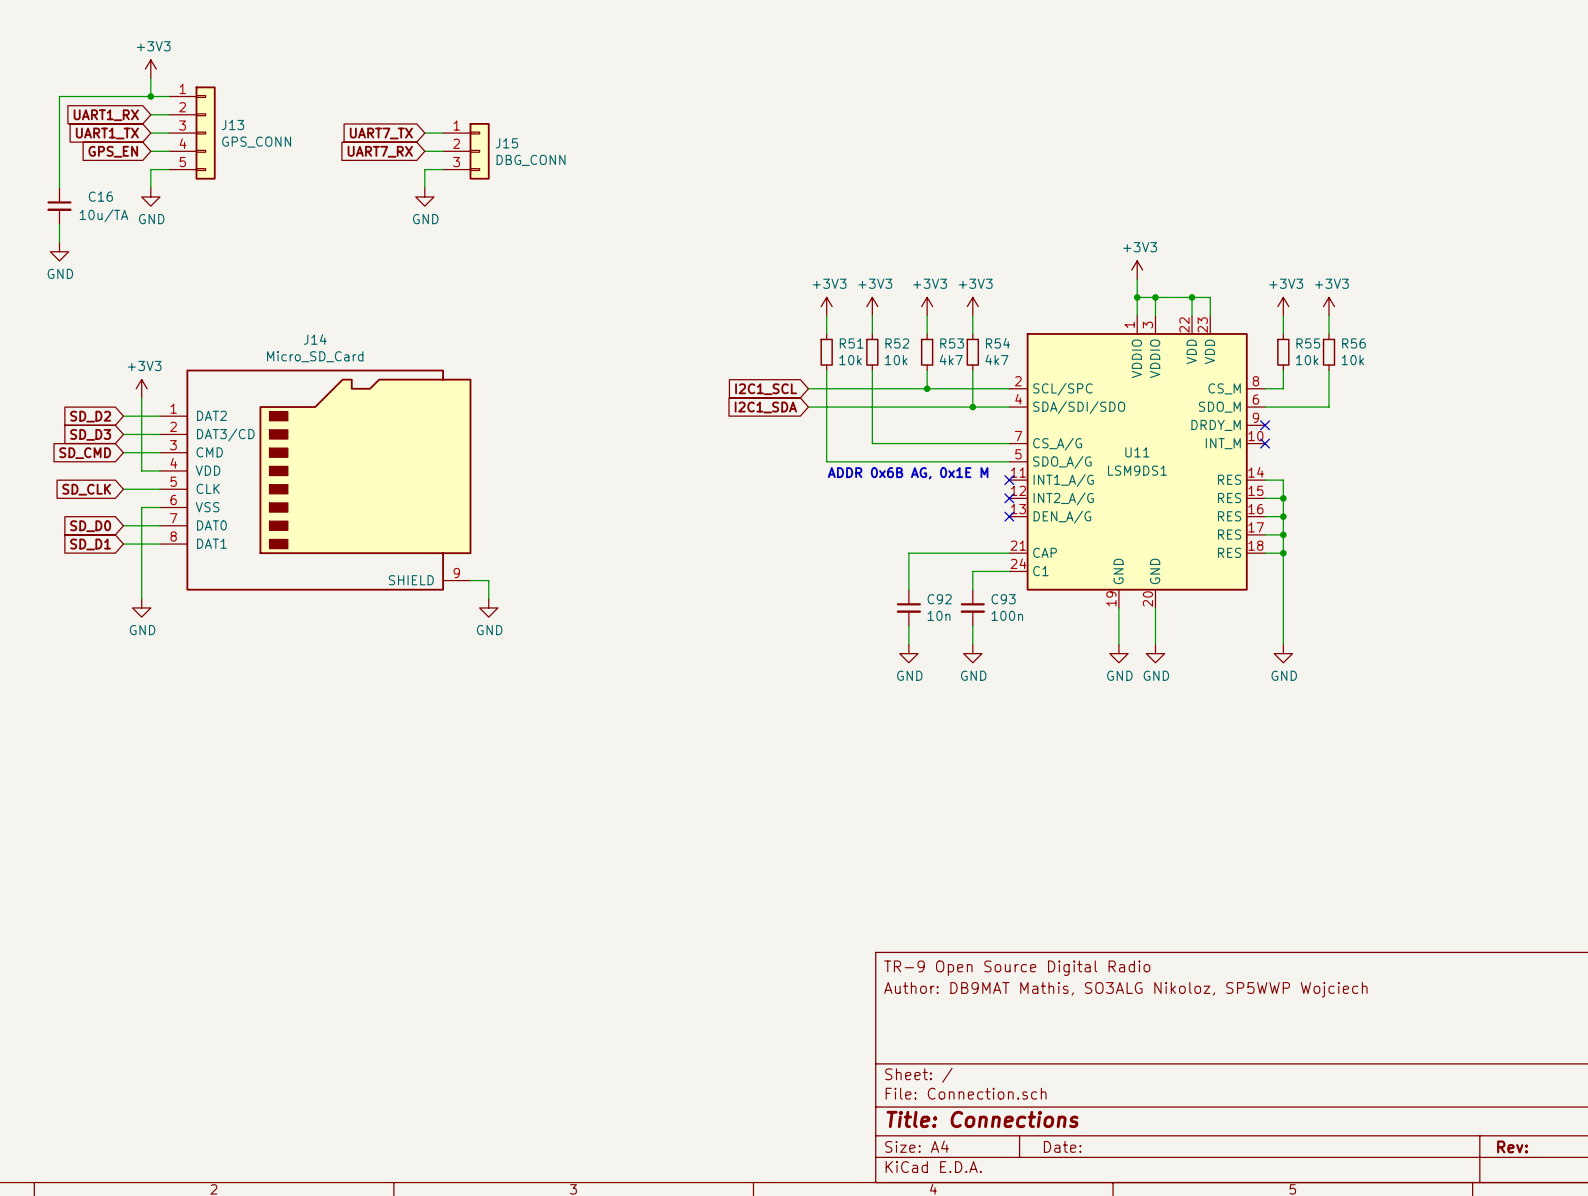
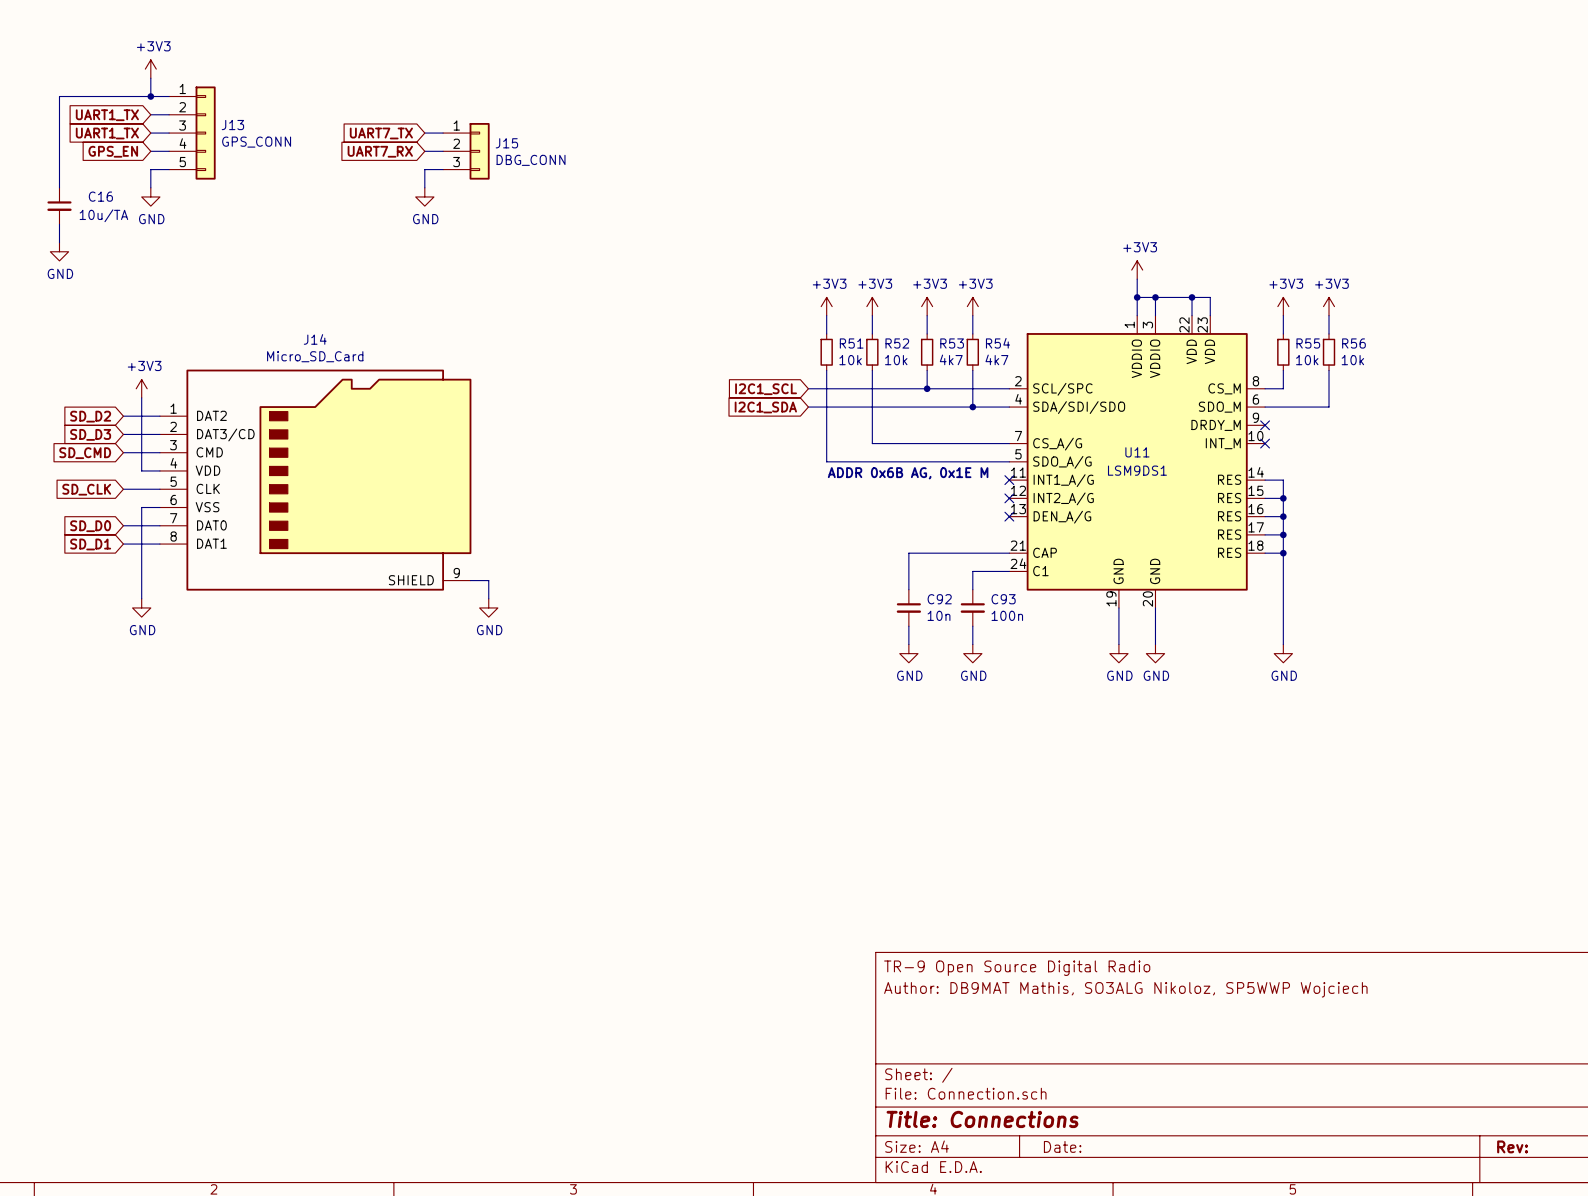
global label: UART1_RX (106, 115) -> UART1_TX (107, 115)

